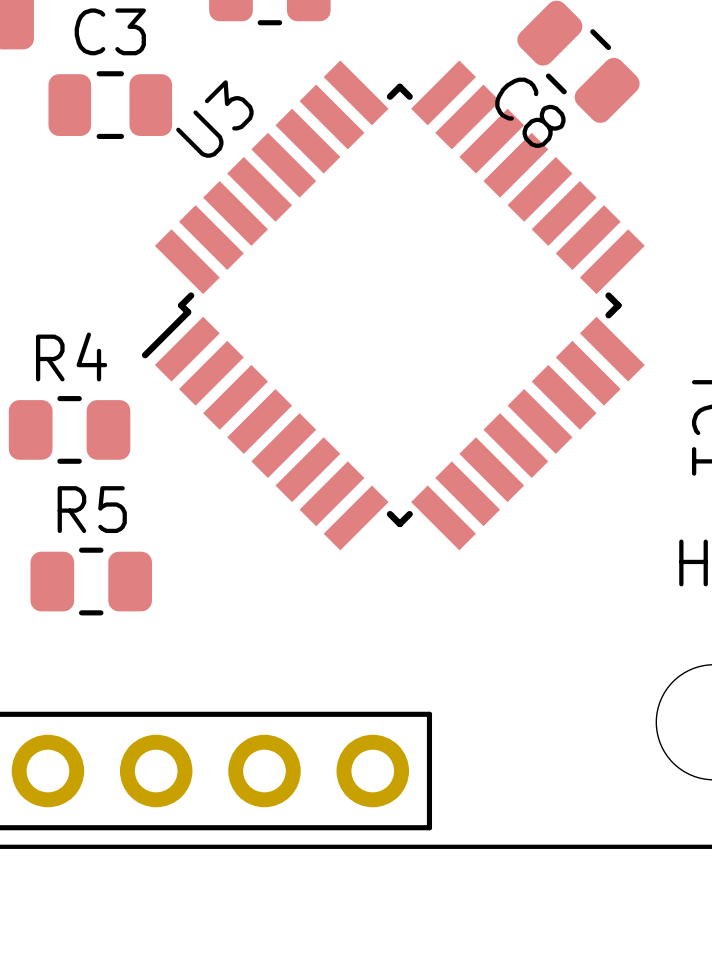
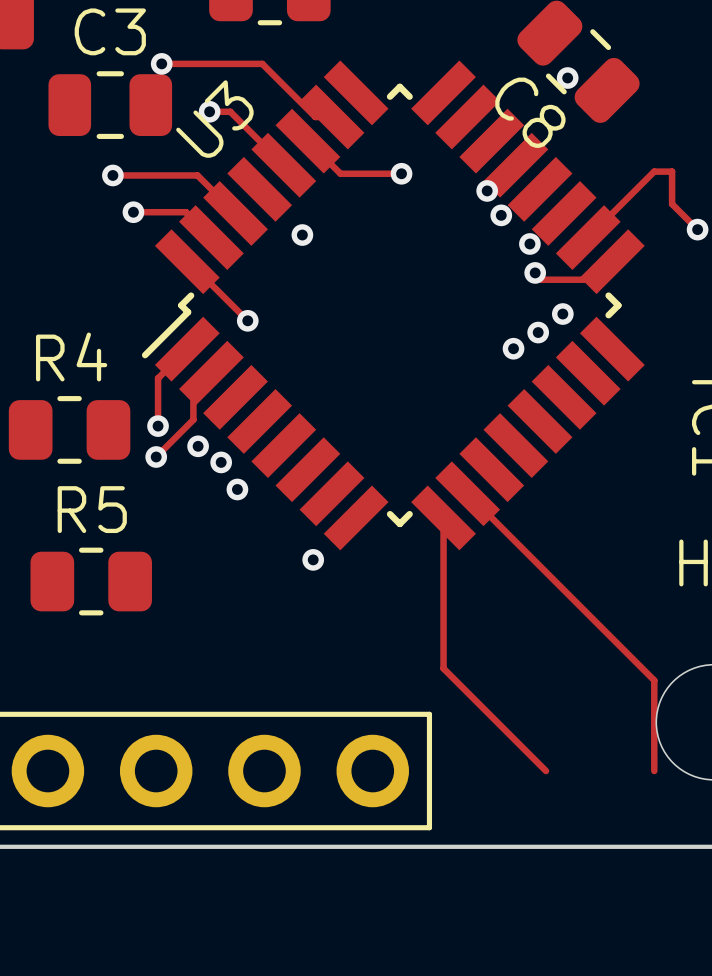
track: none -> (161, 63) (262, 63) (315, 117) (332, 117)
via: none -> (161, 63)
via: none -> (567, 78)
track: none -> (209, 111) (230, 111) (283, 165)
via: none -> (209, 111)
track: none -> (307, 141) (340, 173) (401, 173)
via: none -> (401, 173)
track: none -> (112, 175) (197, 175) (235, 213)
via: none -> (112, 175)
via: none -> (487, 190)
track: none -> (133, 212) (186, 212) (211, 237)
via: none -> (133, 212)
via: none -> (501, 215)
track: none -> (697, 229) (672, 204) (672, 171) (654, 171) (588, 237)
via: none -> (697, 229)
via: none -> (302, 235)
via: none -> (529, 243)
track: none -> (187, 261) (247, 320)
track: none -> (612, 261) (594, 279) (541, 279) (535, 272)
via: none -> (535, 272)
via: none -> (562, 314)
via: none -> (247, 320)
via: none -> (538, 332)
via: none -> (513, 348)
track: none -> (187, 349) (158, 378) (158, 426)
track: none -> (211, 373) (193, 391) (193, 419) (156, 457)
via: none -> (158, 426)
via: none -> (198, 446)
via: none -> (156, 457)
via: none -> (221, 462)
via: none -> (237, 489)
track: none -> (467, 493) (654, 680) (654, 771)
track: none -> (443, 517) (443, 668) (546, 771)
via: none -> (313, 559)

